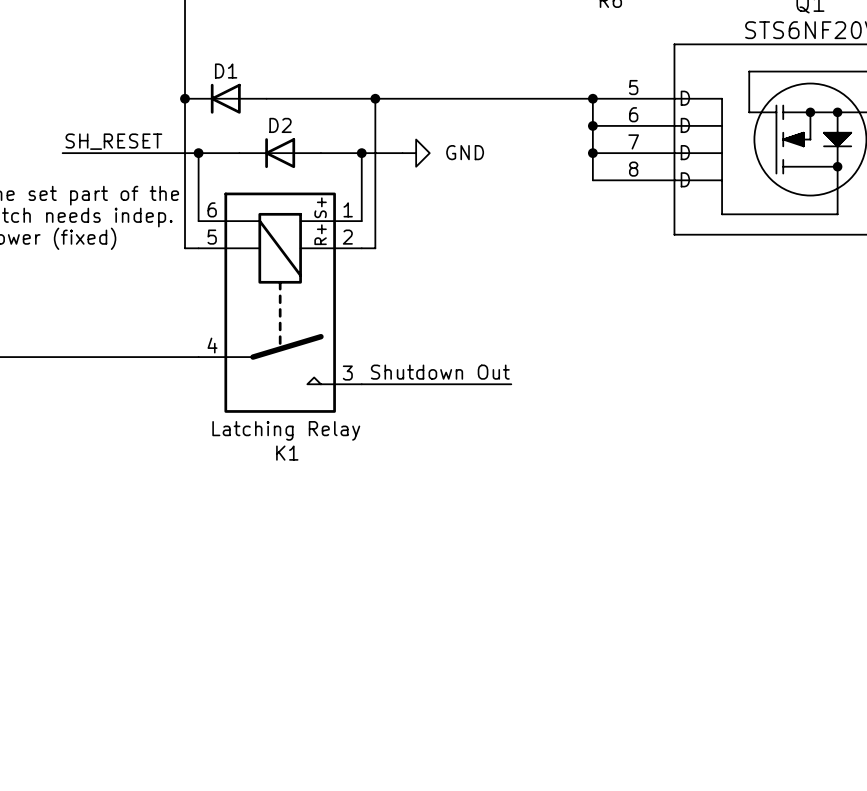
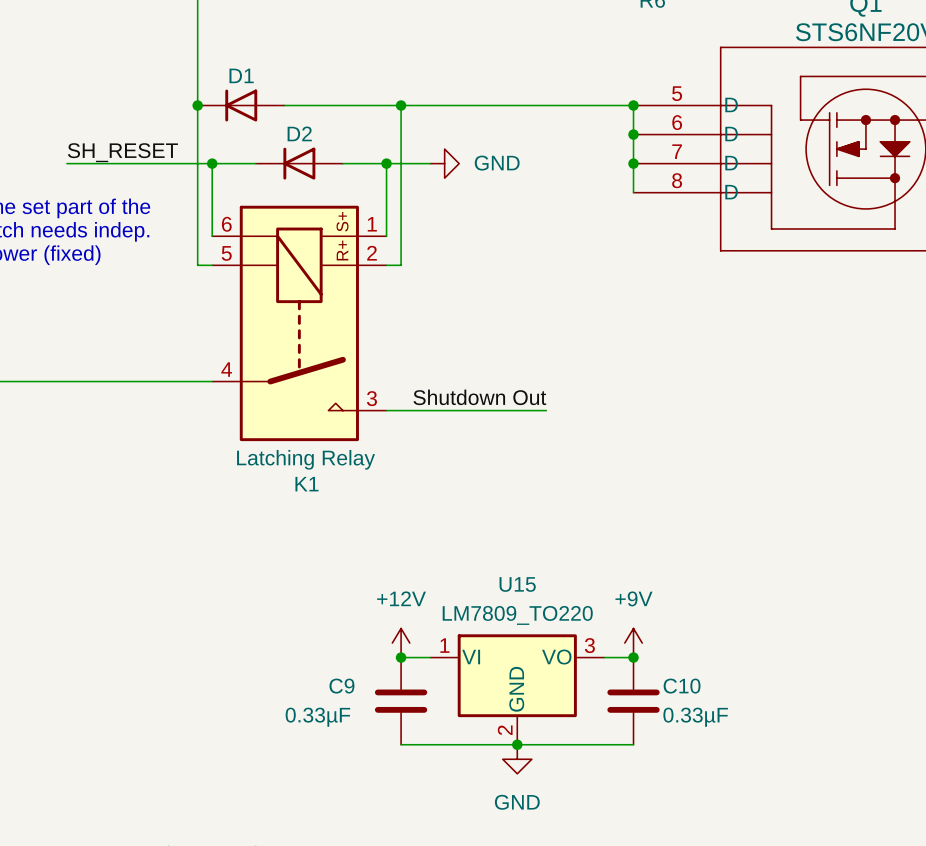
power symbol: none -> +12V (401, 643)
power symbol: none -> +9V (633, 643)
wire: none -> (401, 657) (430, 657)
junction: none -> (401, 657)
wire: none -> (604, 657) (633, 657)
junction: none -> (633, 657)
U15: none -> LM7809_TO220 (517, 689)
C9: none -> 0.33µF (401, 701)
C10: none -> 0.33µF (633, 701)
wire: none -> (401, 744) (633, 744)
junction: none -> (517, 744)
power symbol: none -> GND (517, 759)

